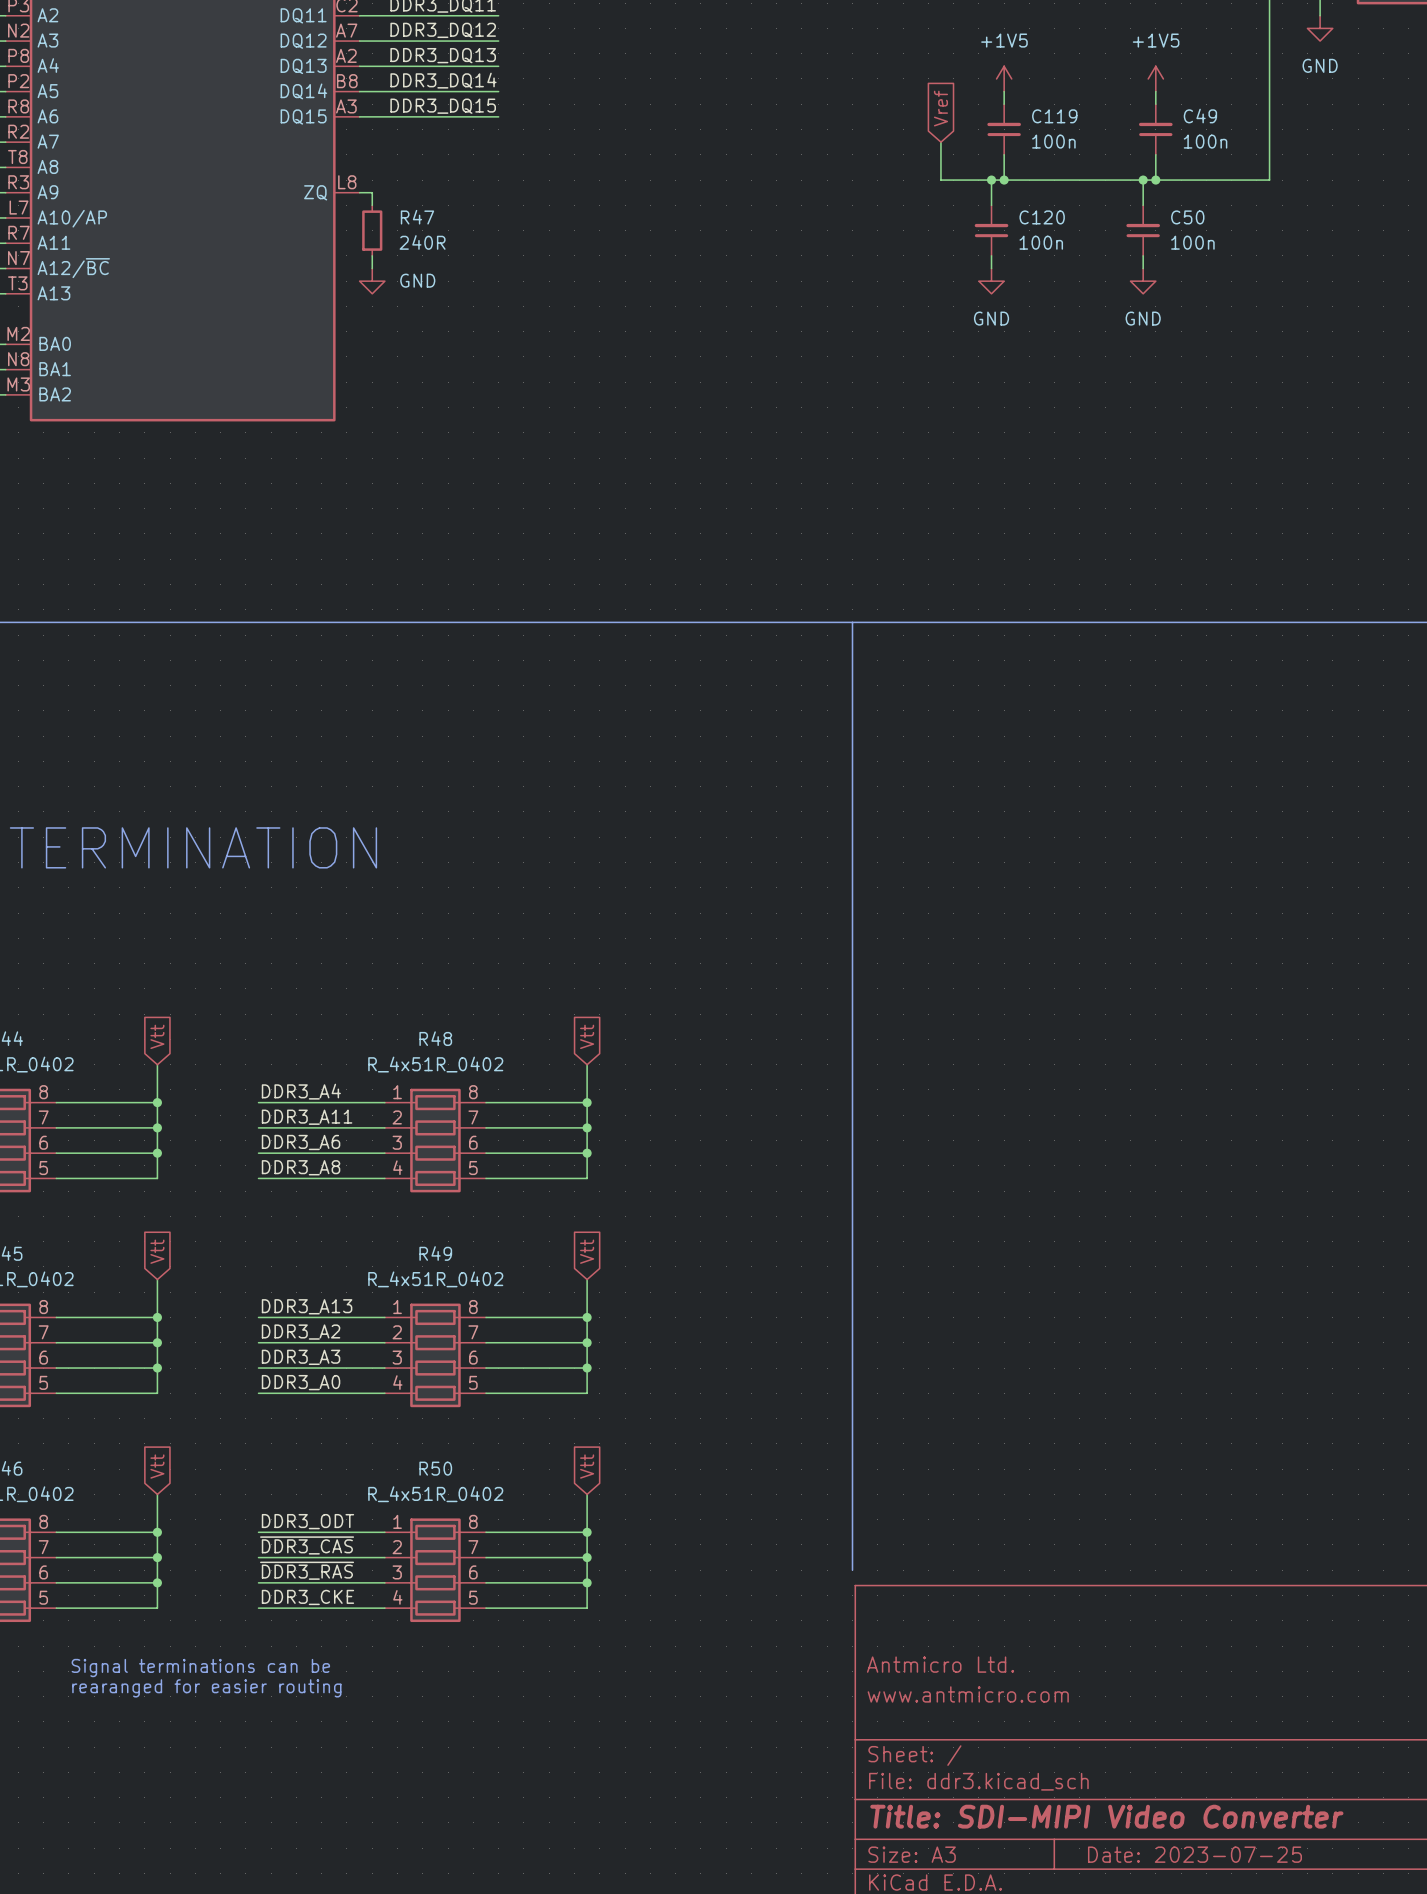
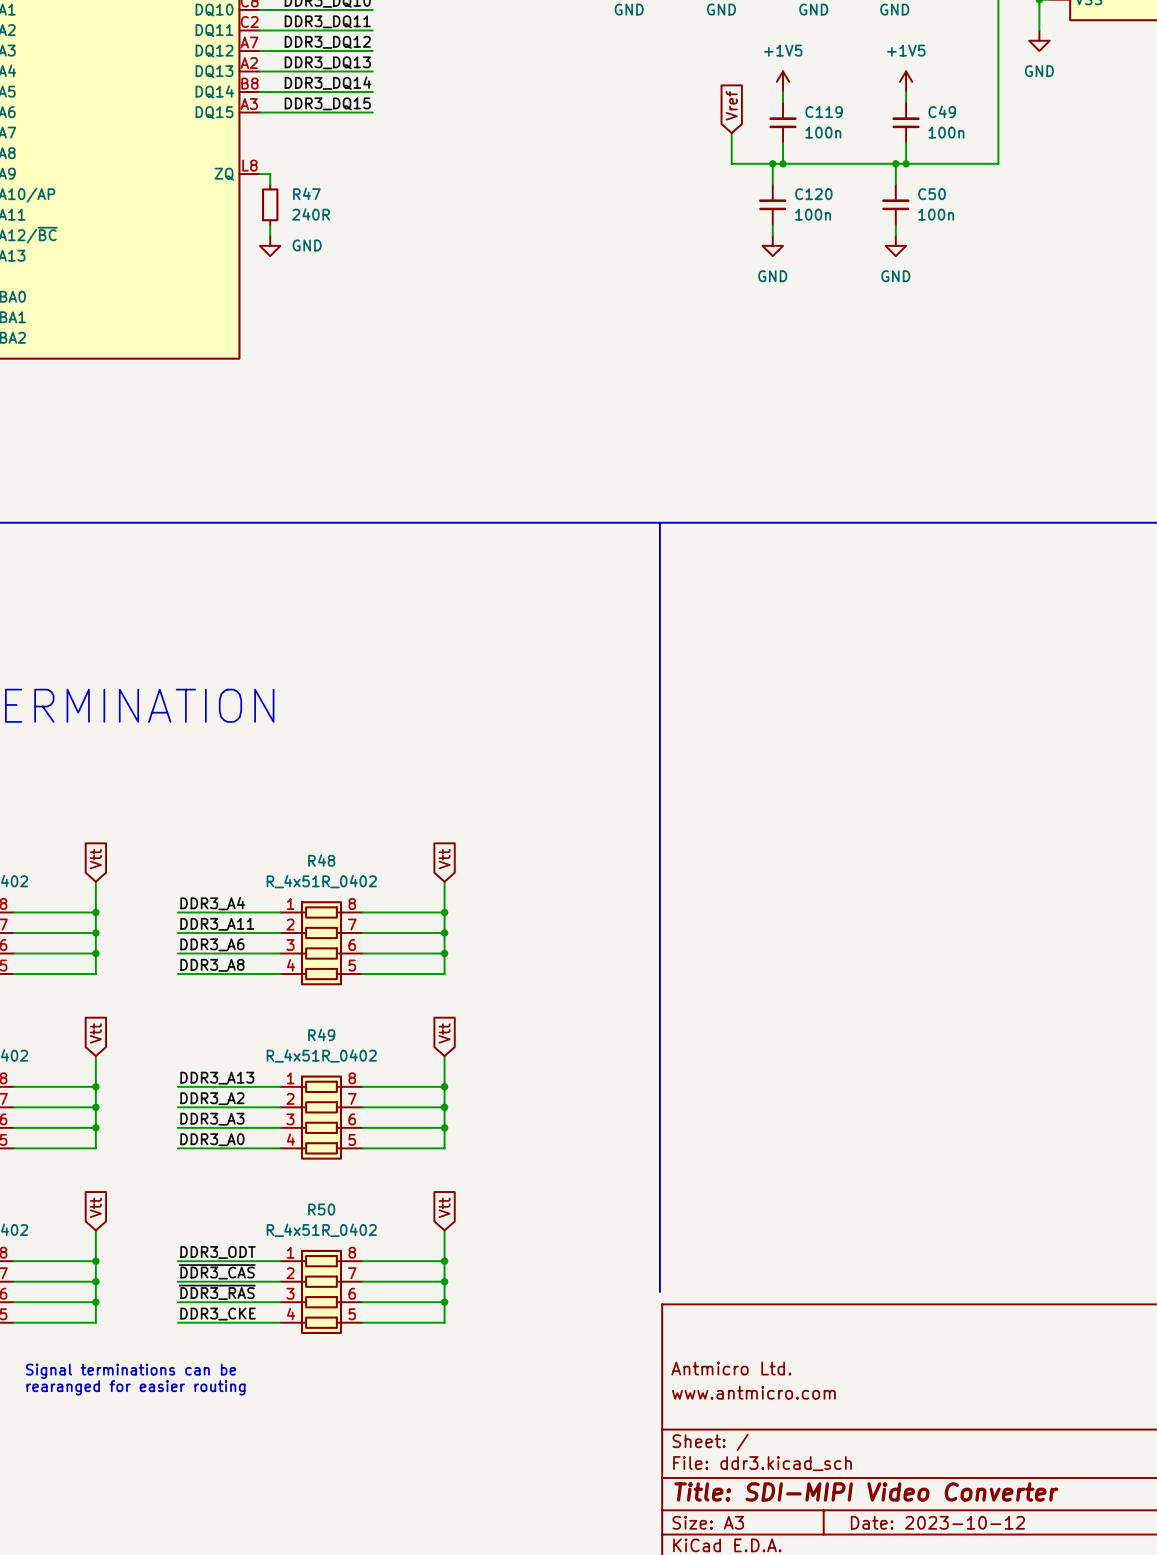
title block: Date: 2023-07-25 (1194, 1854) -> Date: 2023-10-12 (937, 1522)

